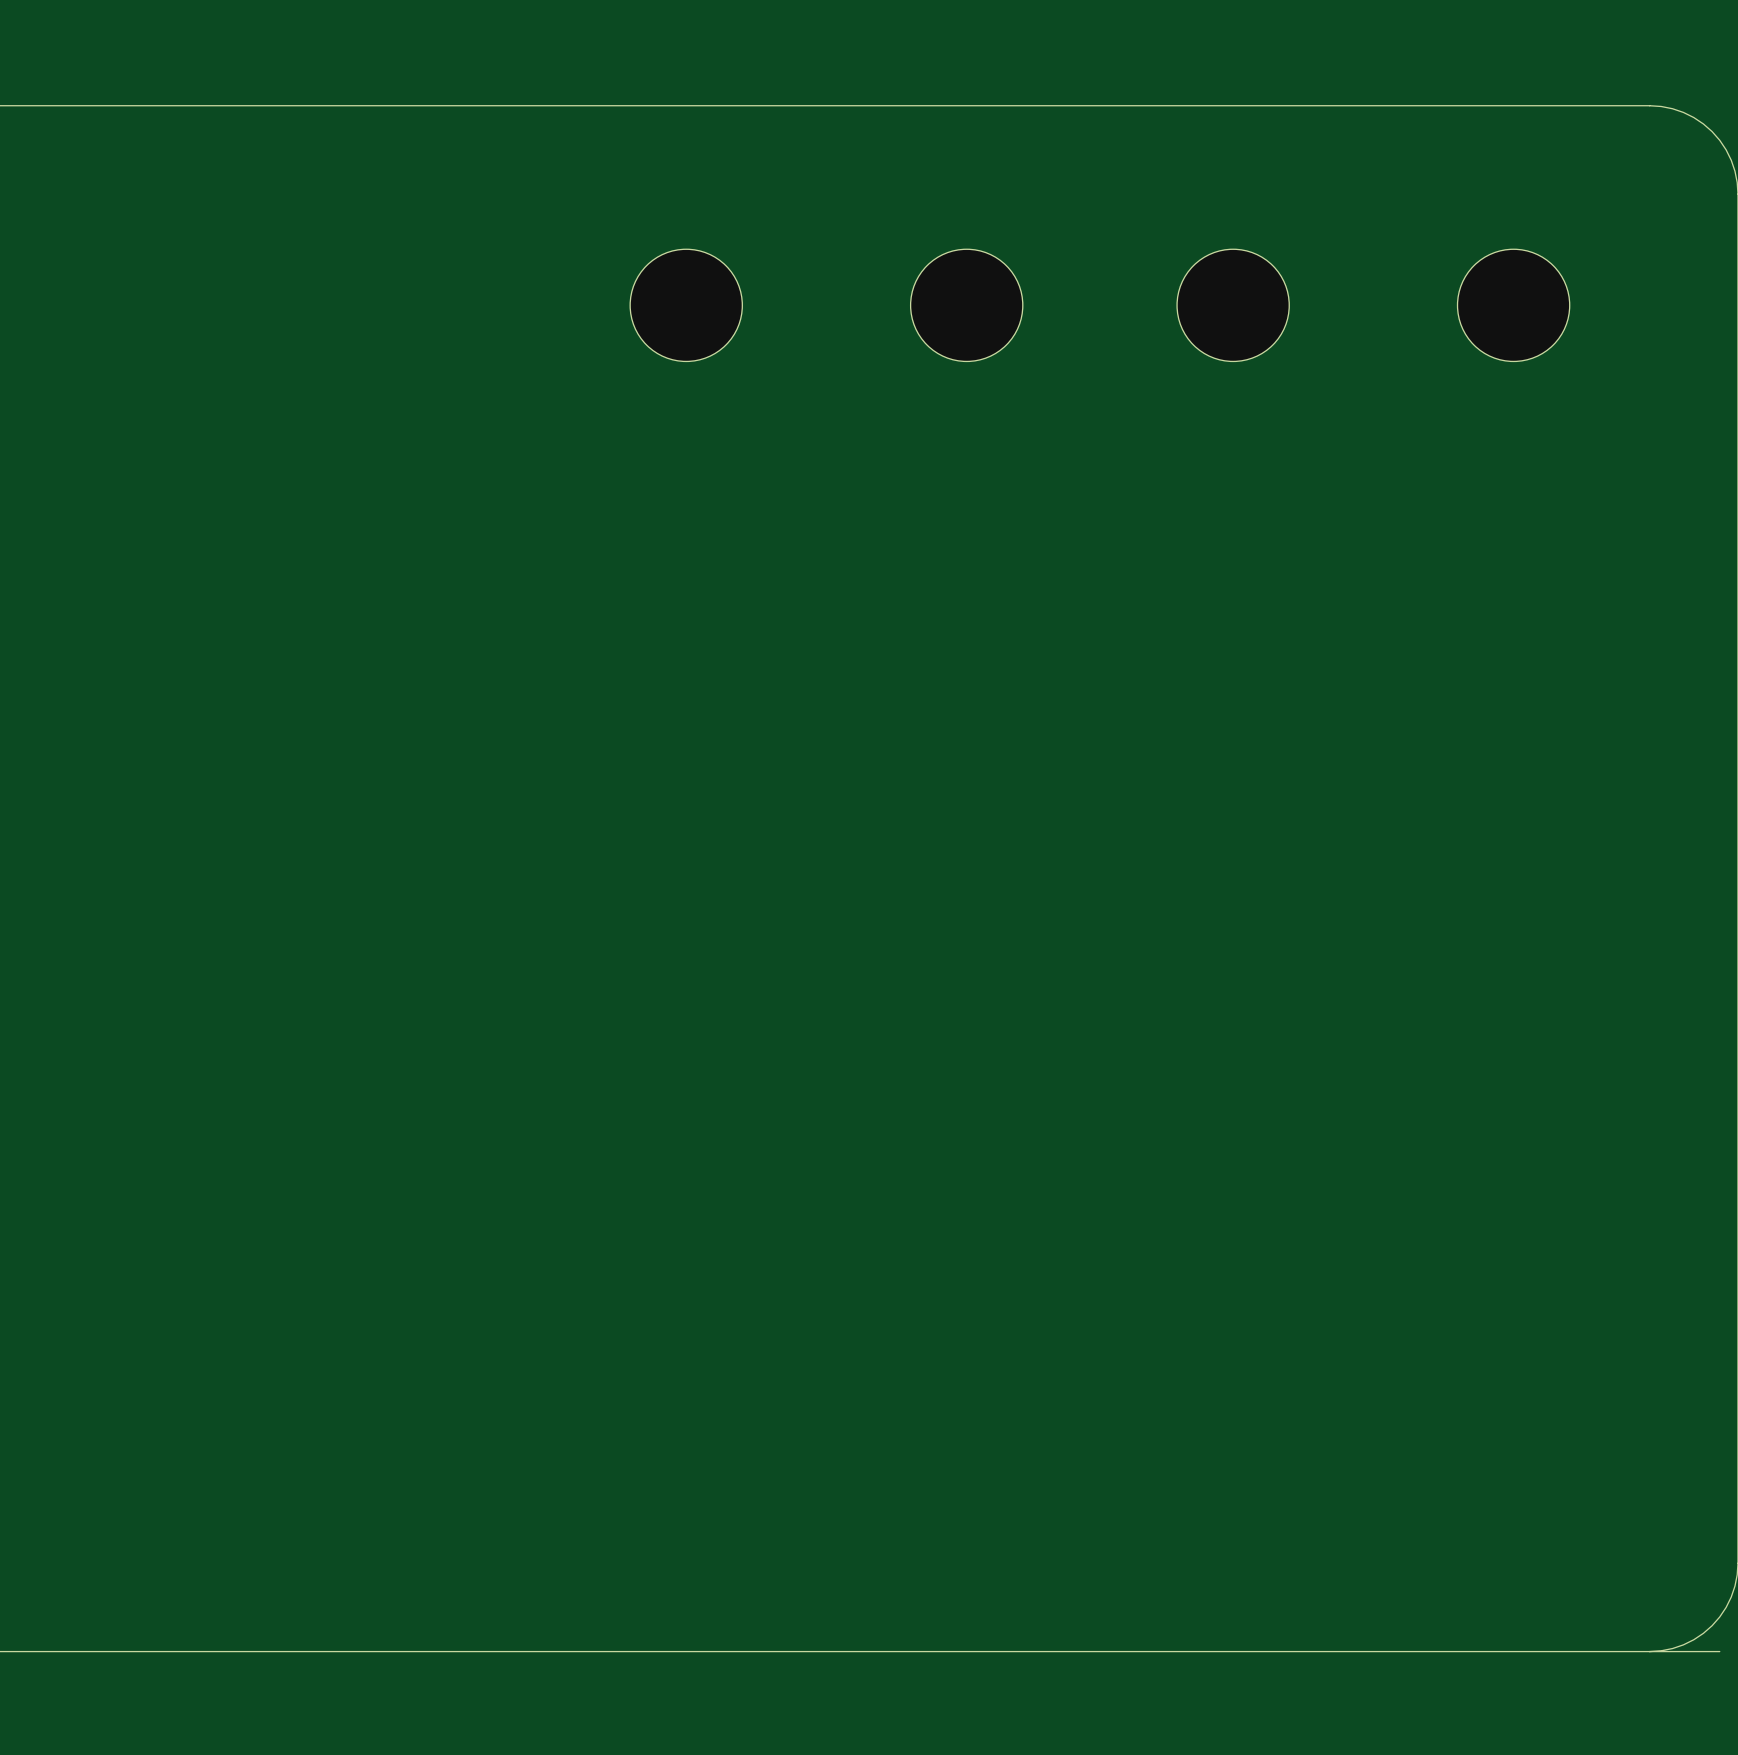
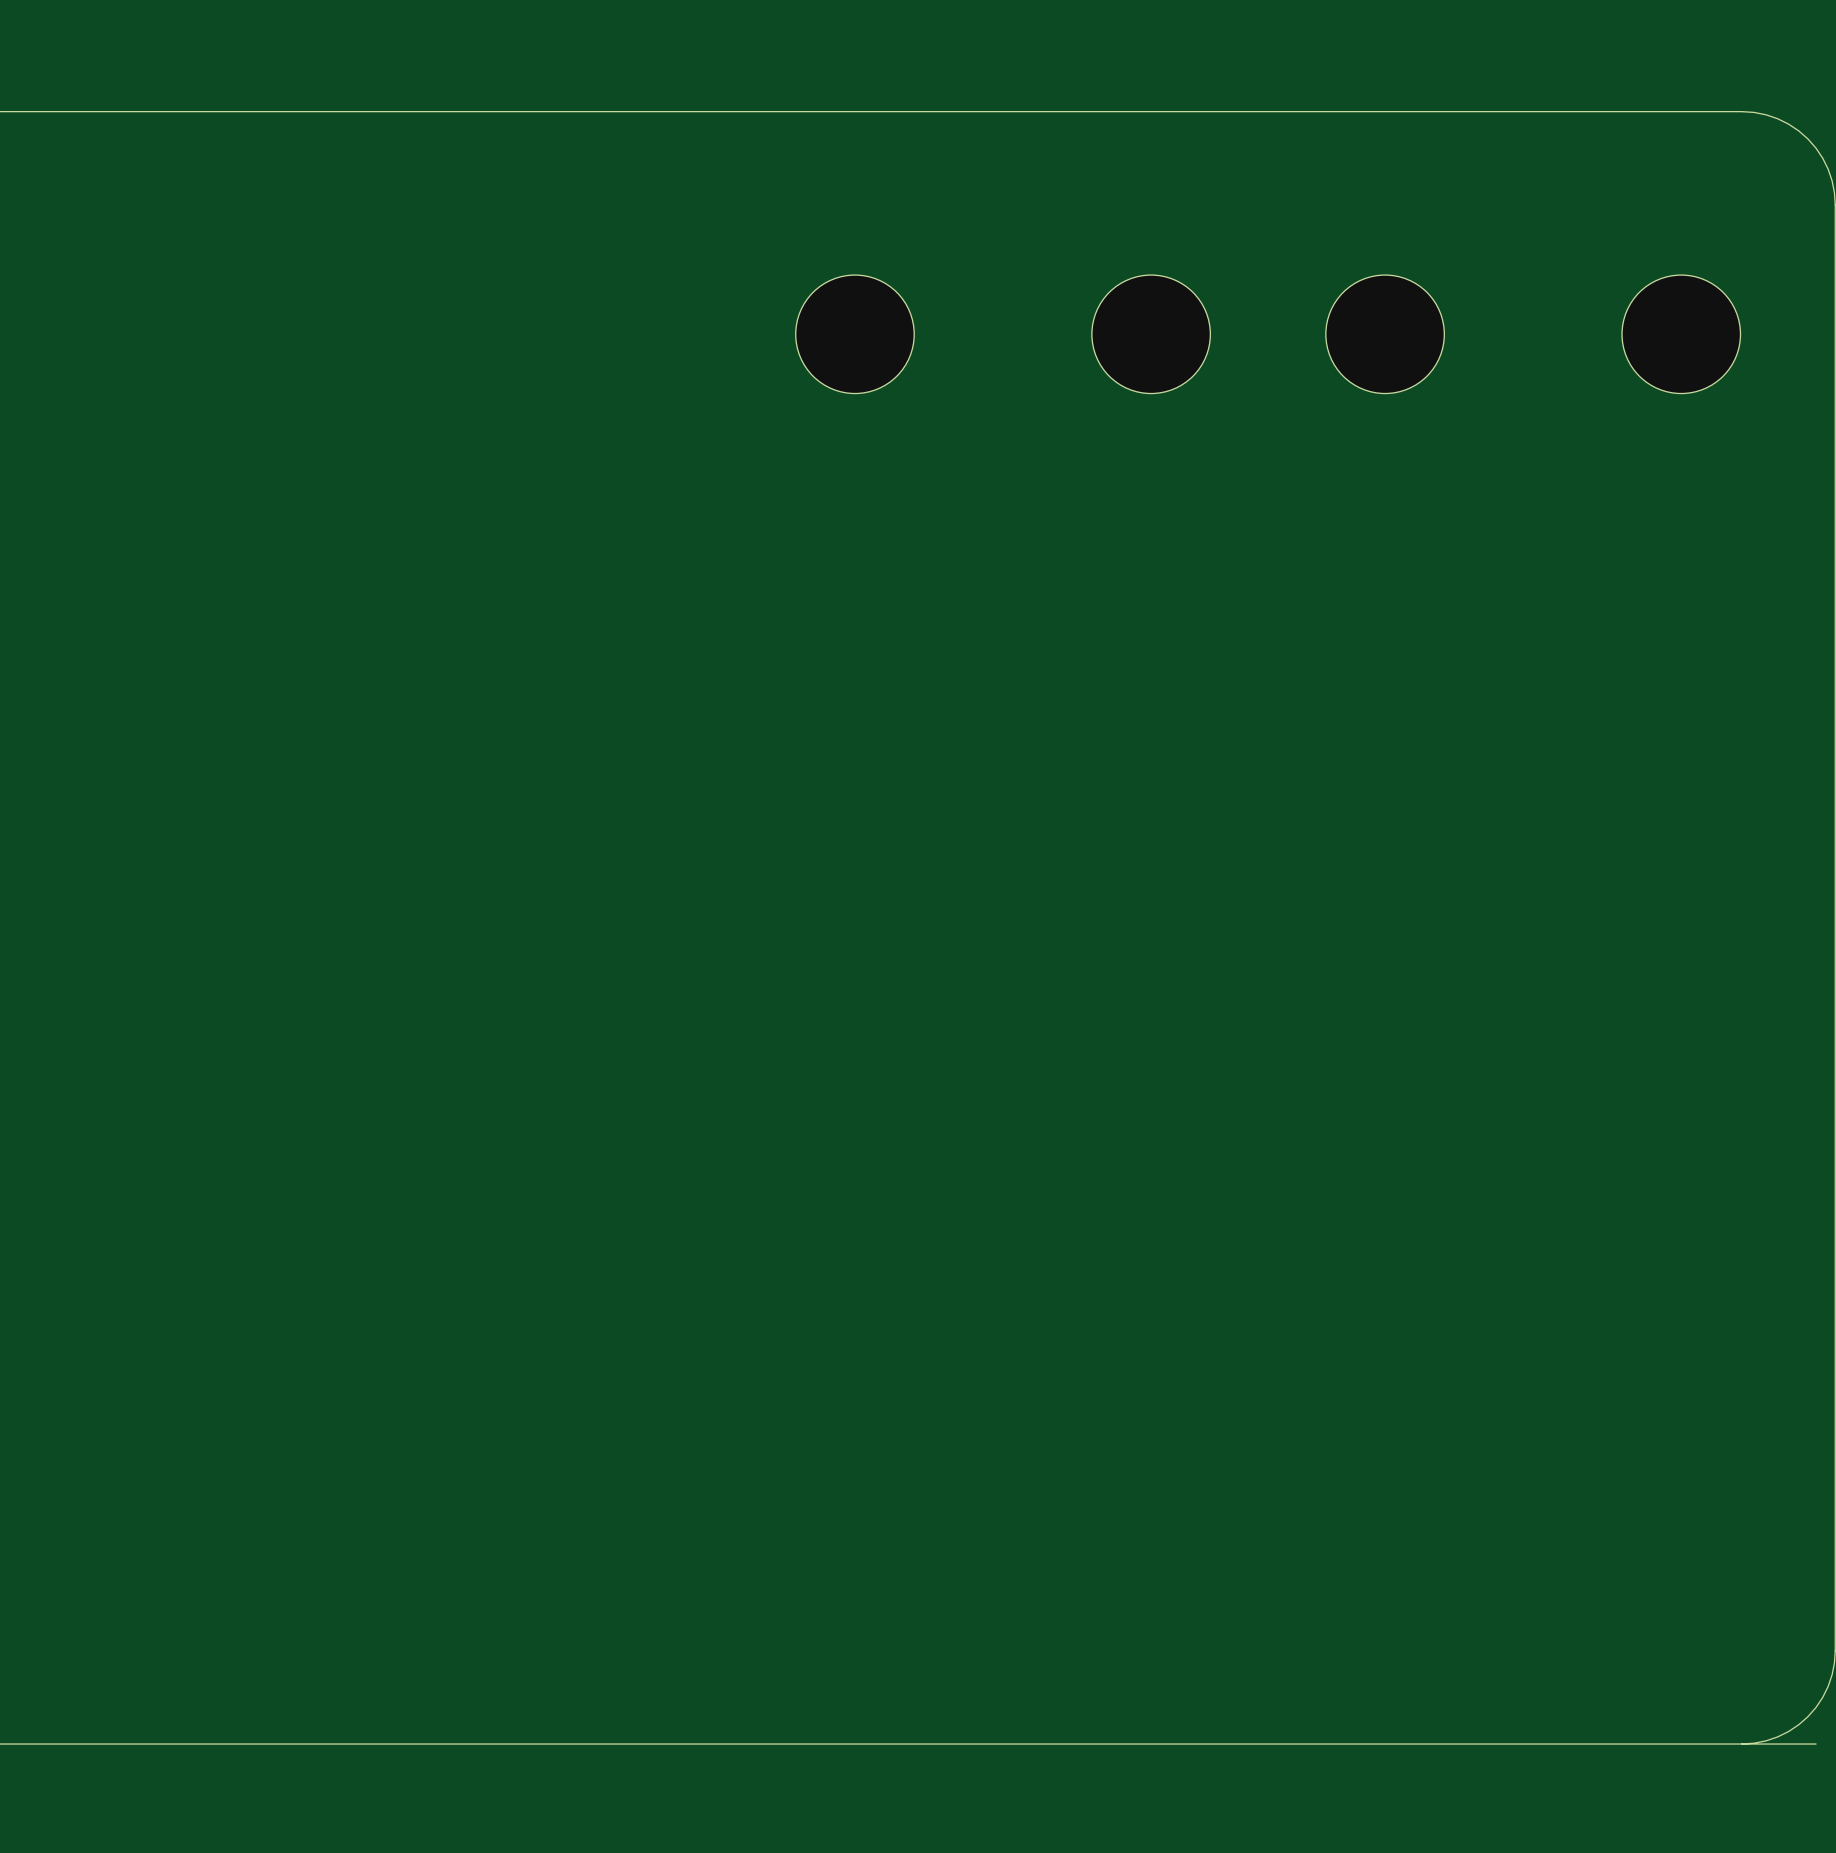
hole: (686, 305) -> none
hole: (966, 305) -> none
hole: (1233, 305) -> none
hole position: (1513, 305) -> (1681, 334)
hole: none -> (854, 334)
hole: none -> (1151, 334)
hole: none -> (1385, 334)

